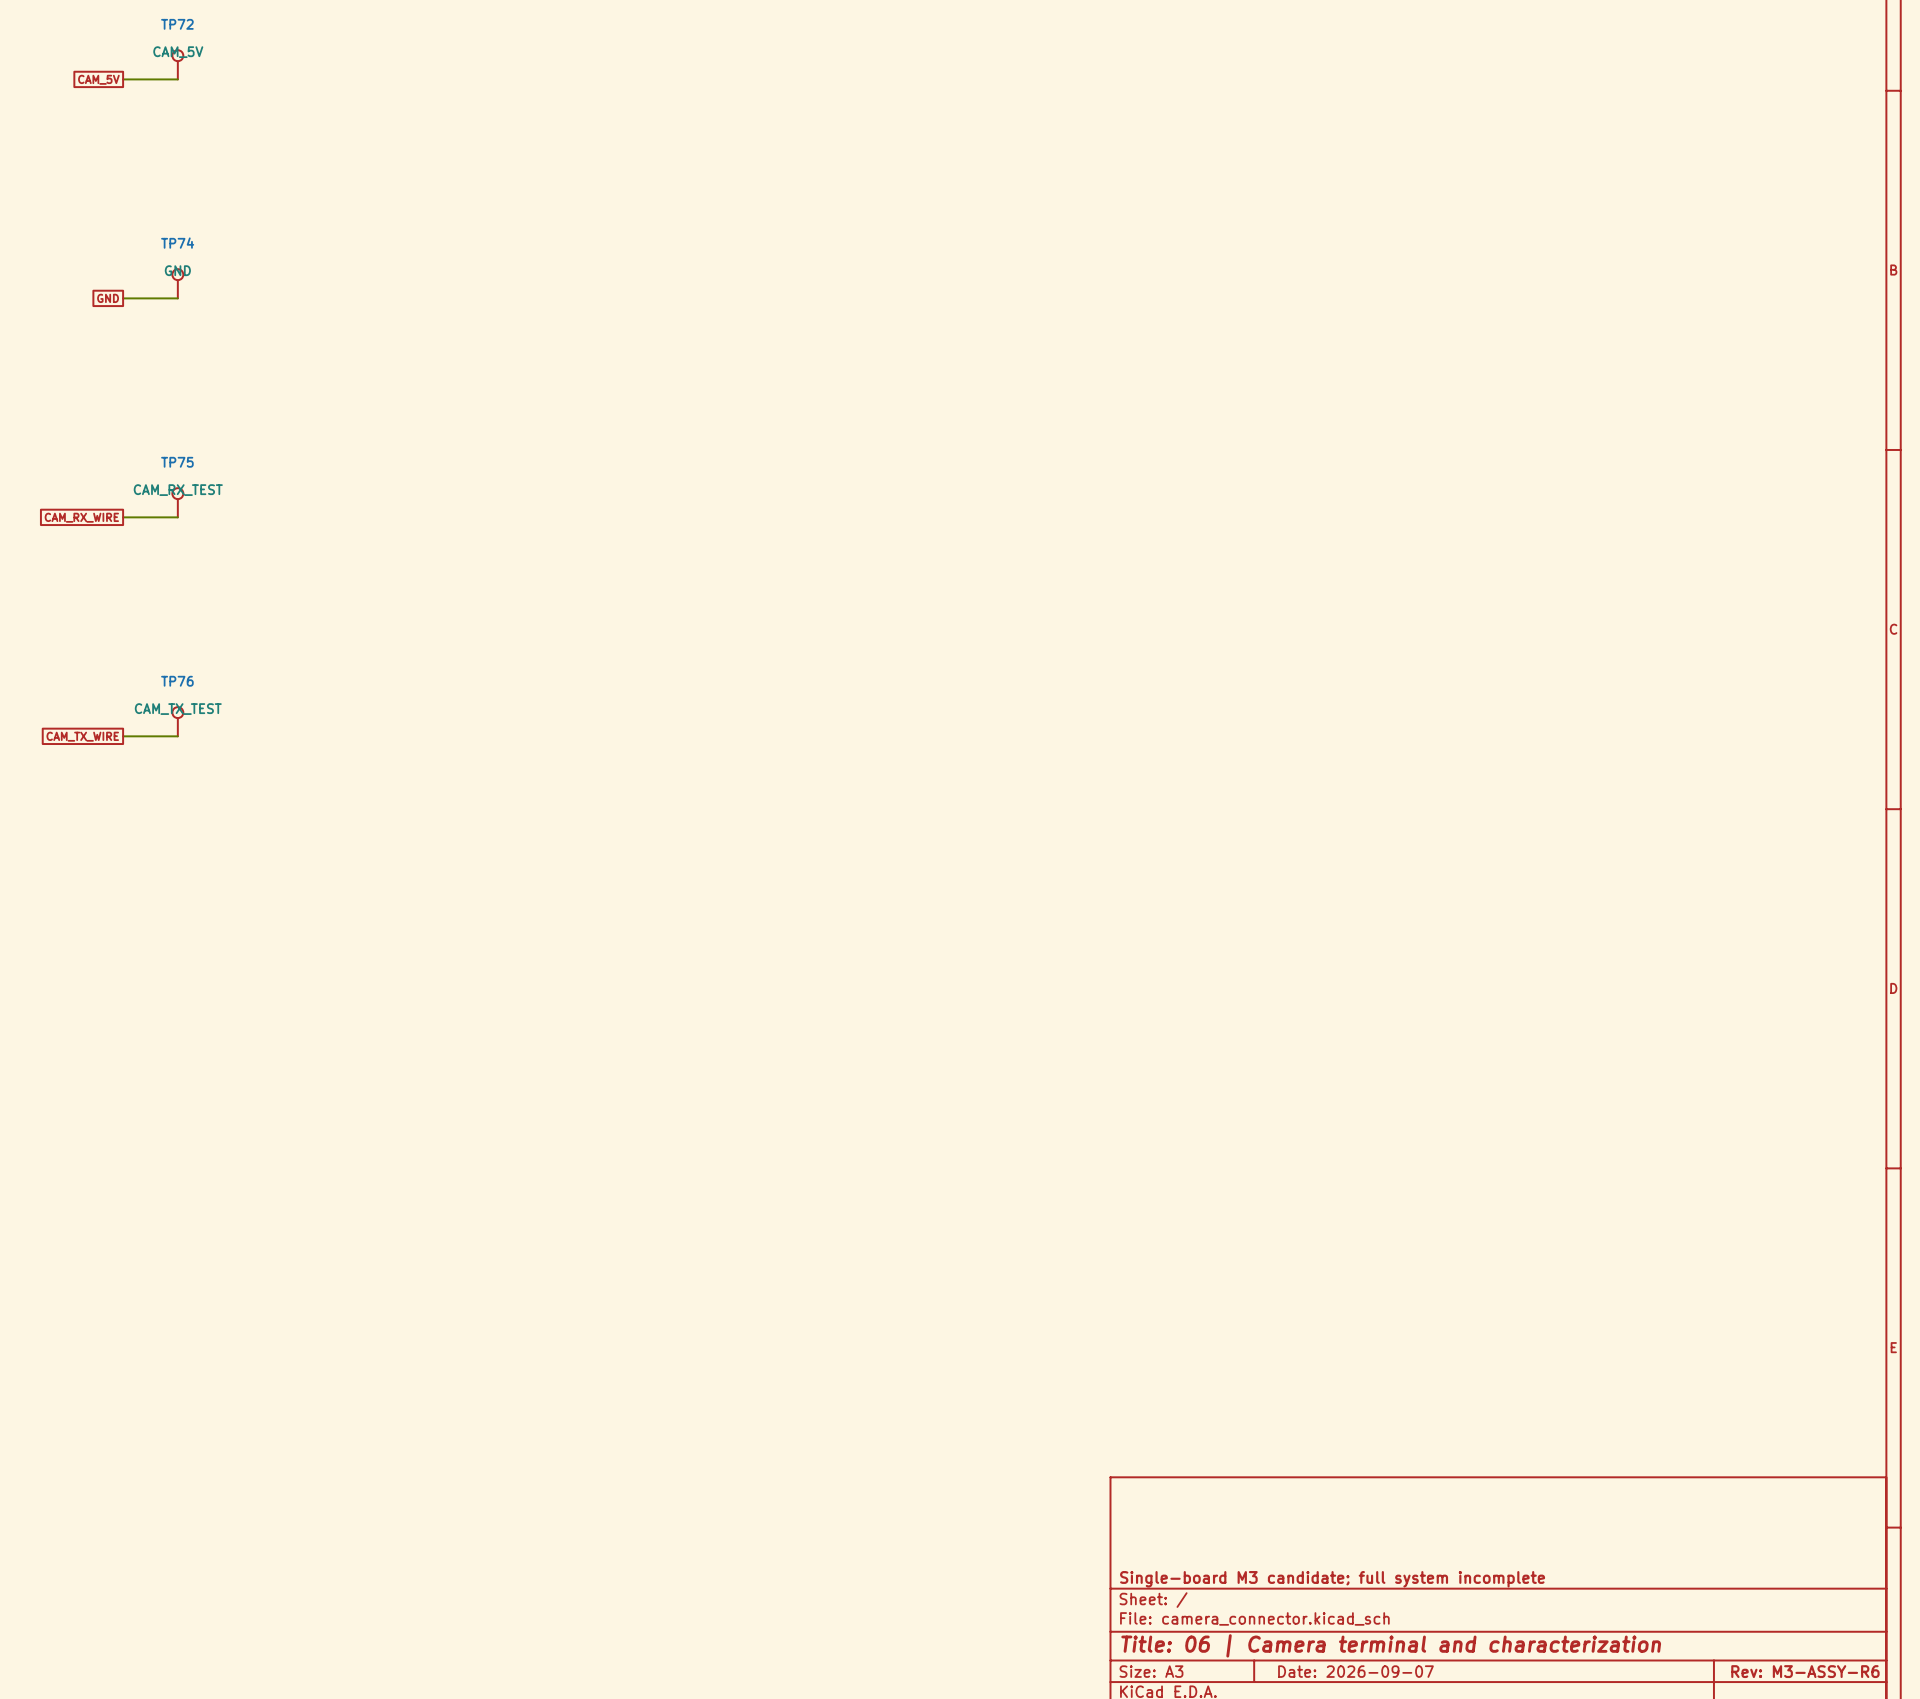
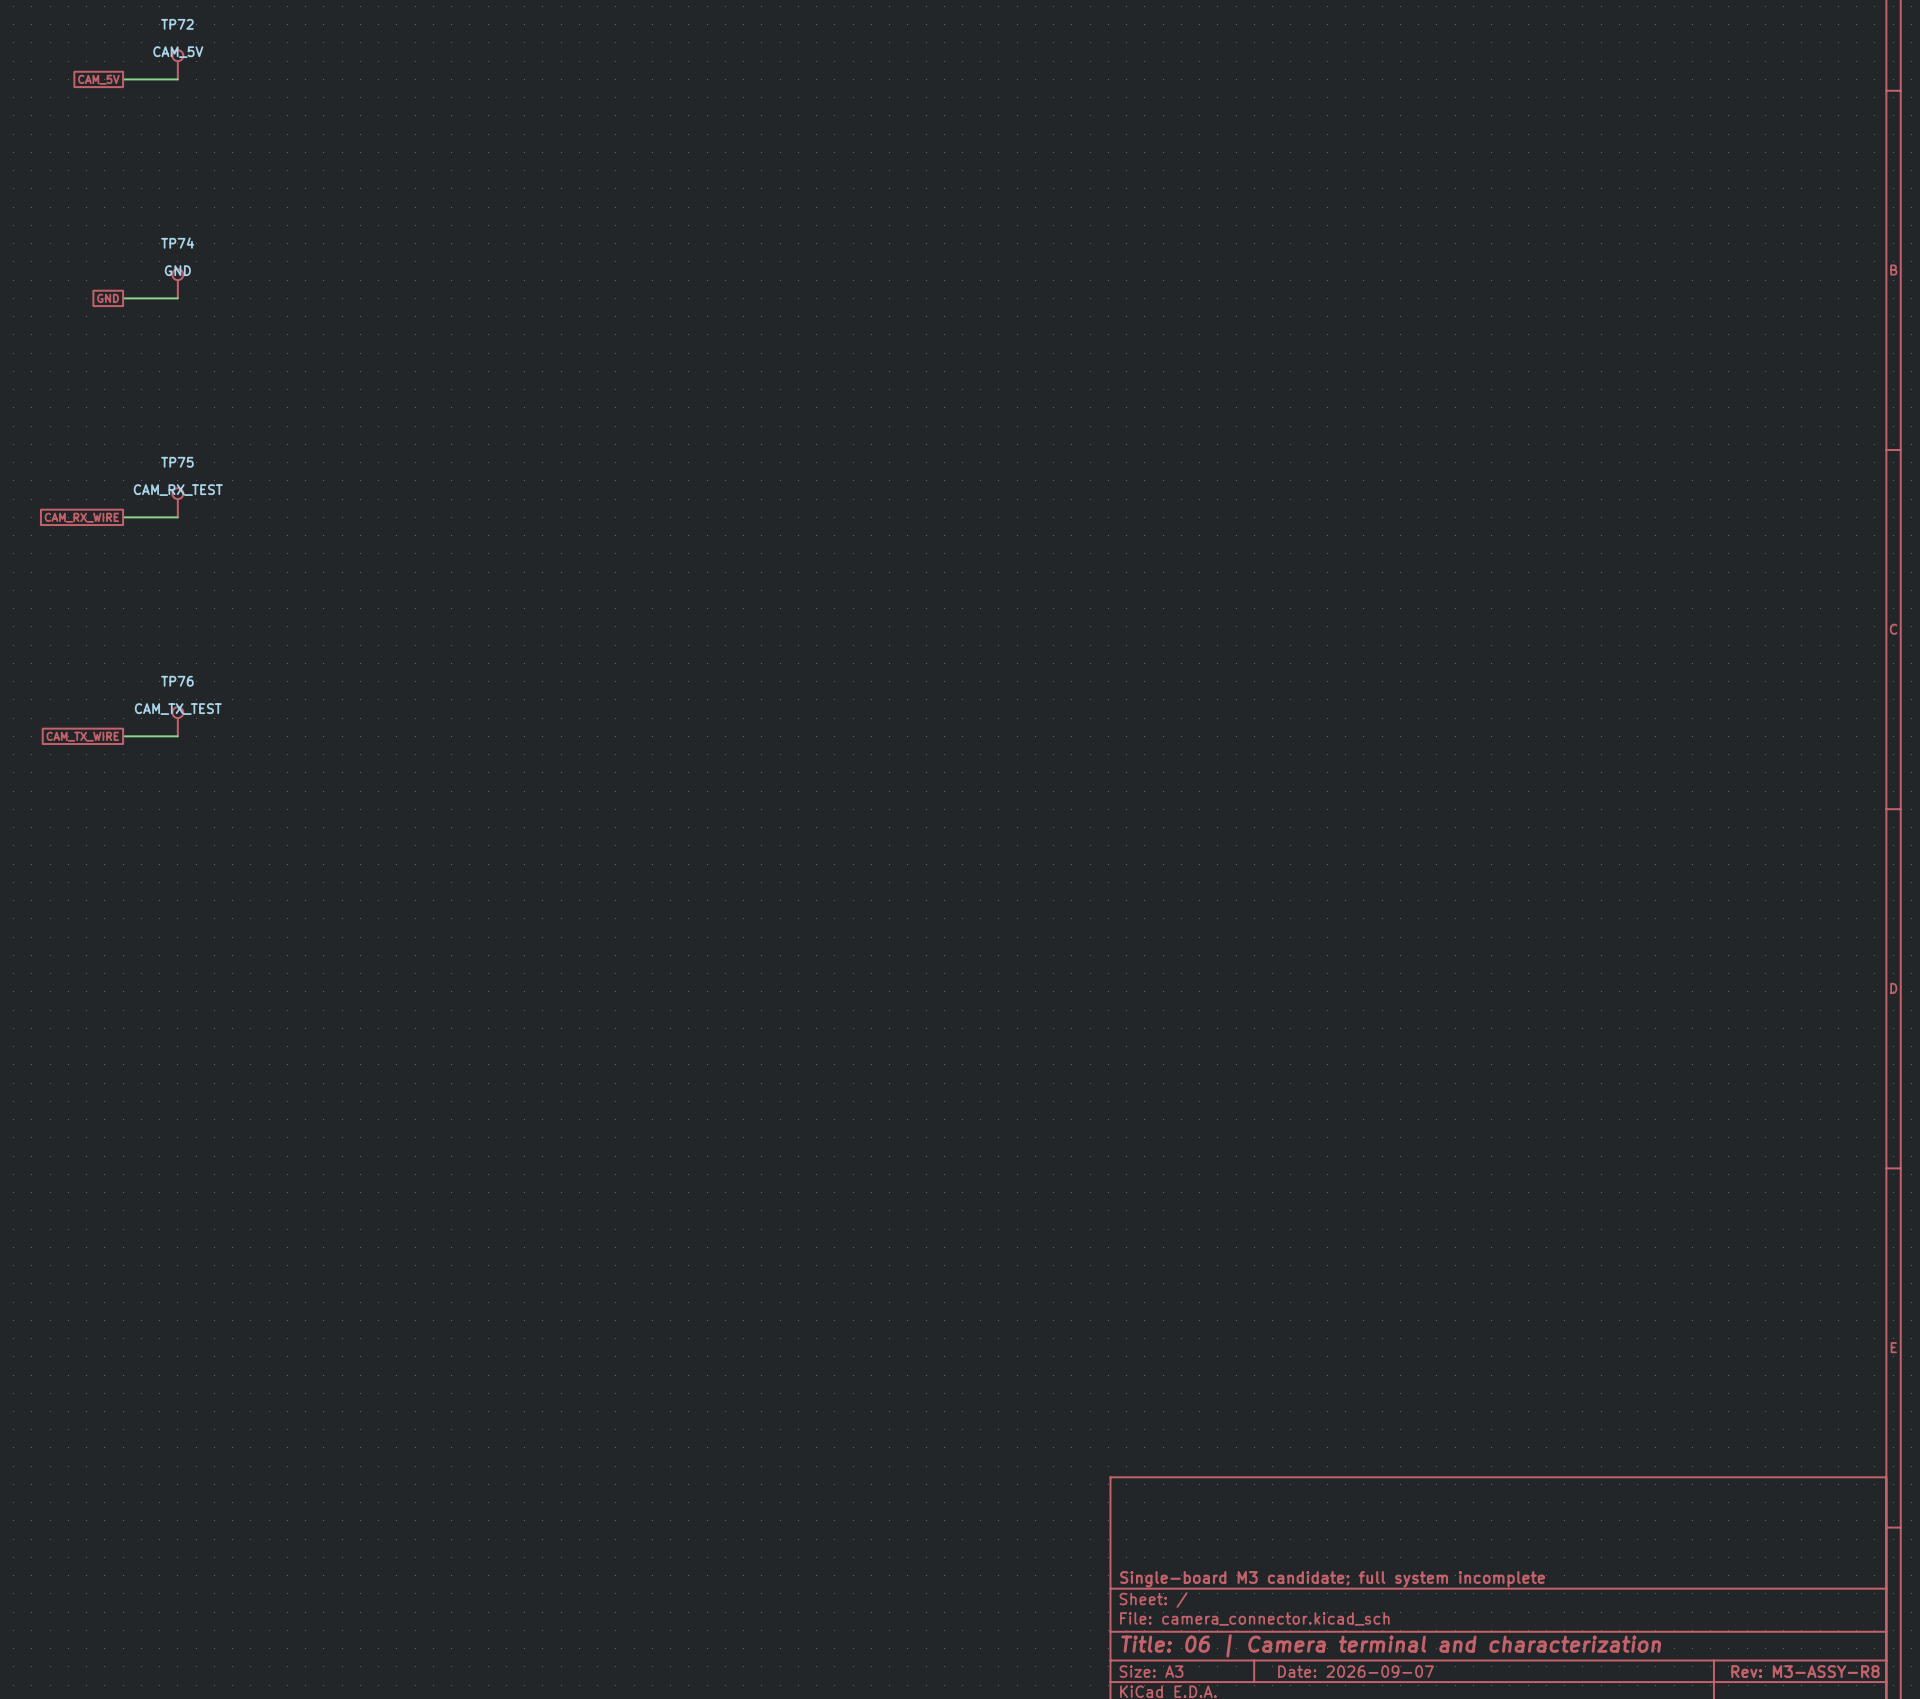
title block: Rev: M3-ASSY-R6 (1805, 1671) -> Rev: M3-ASSY-R8 (1805, 1671)

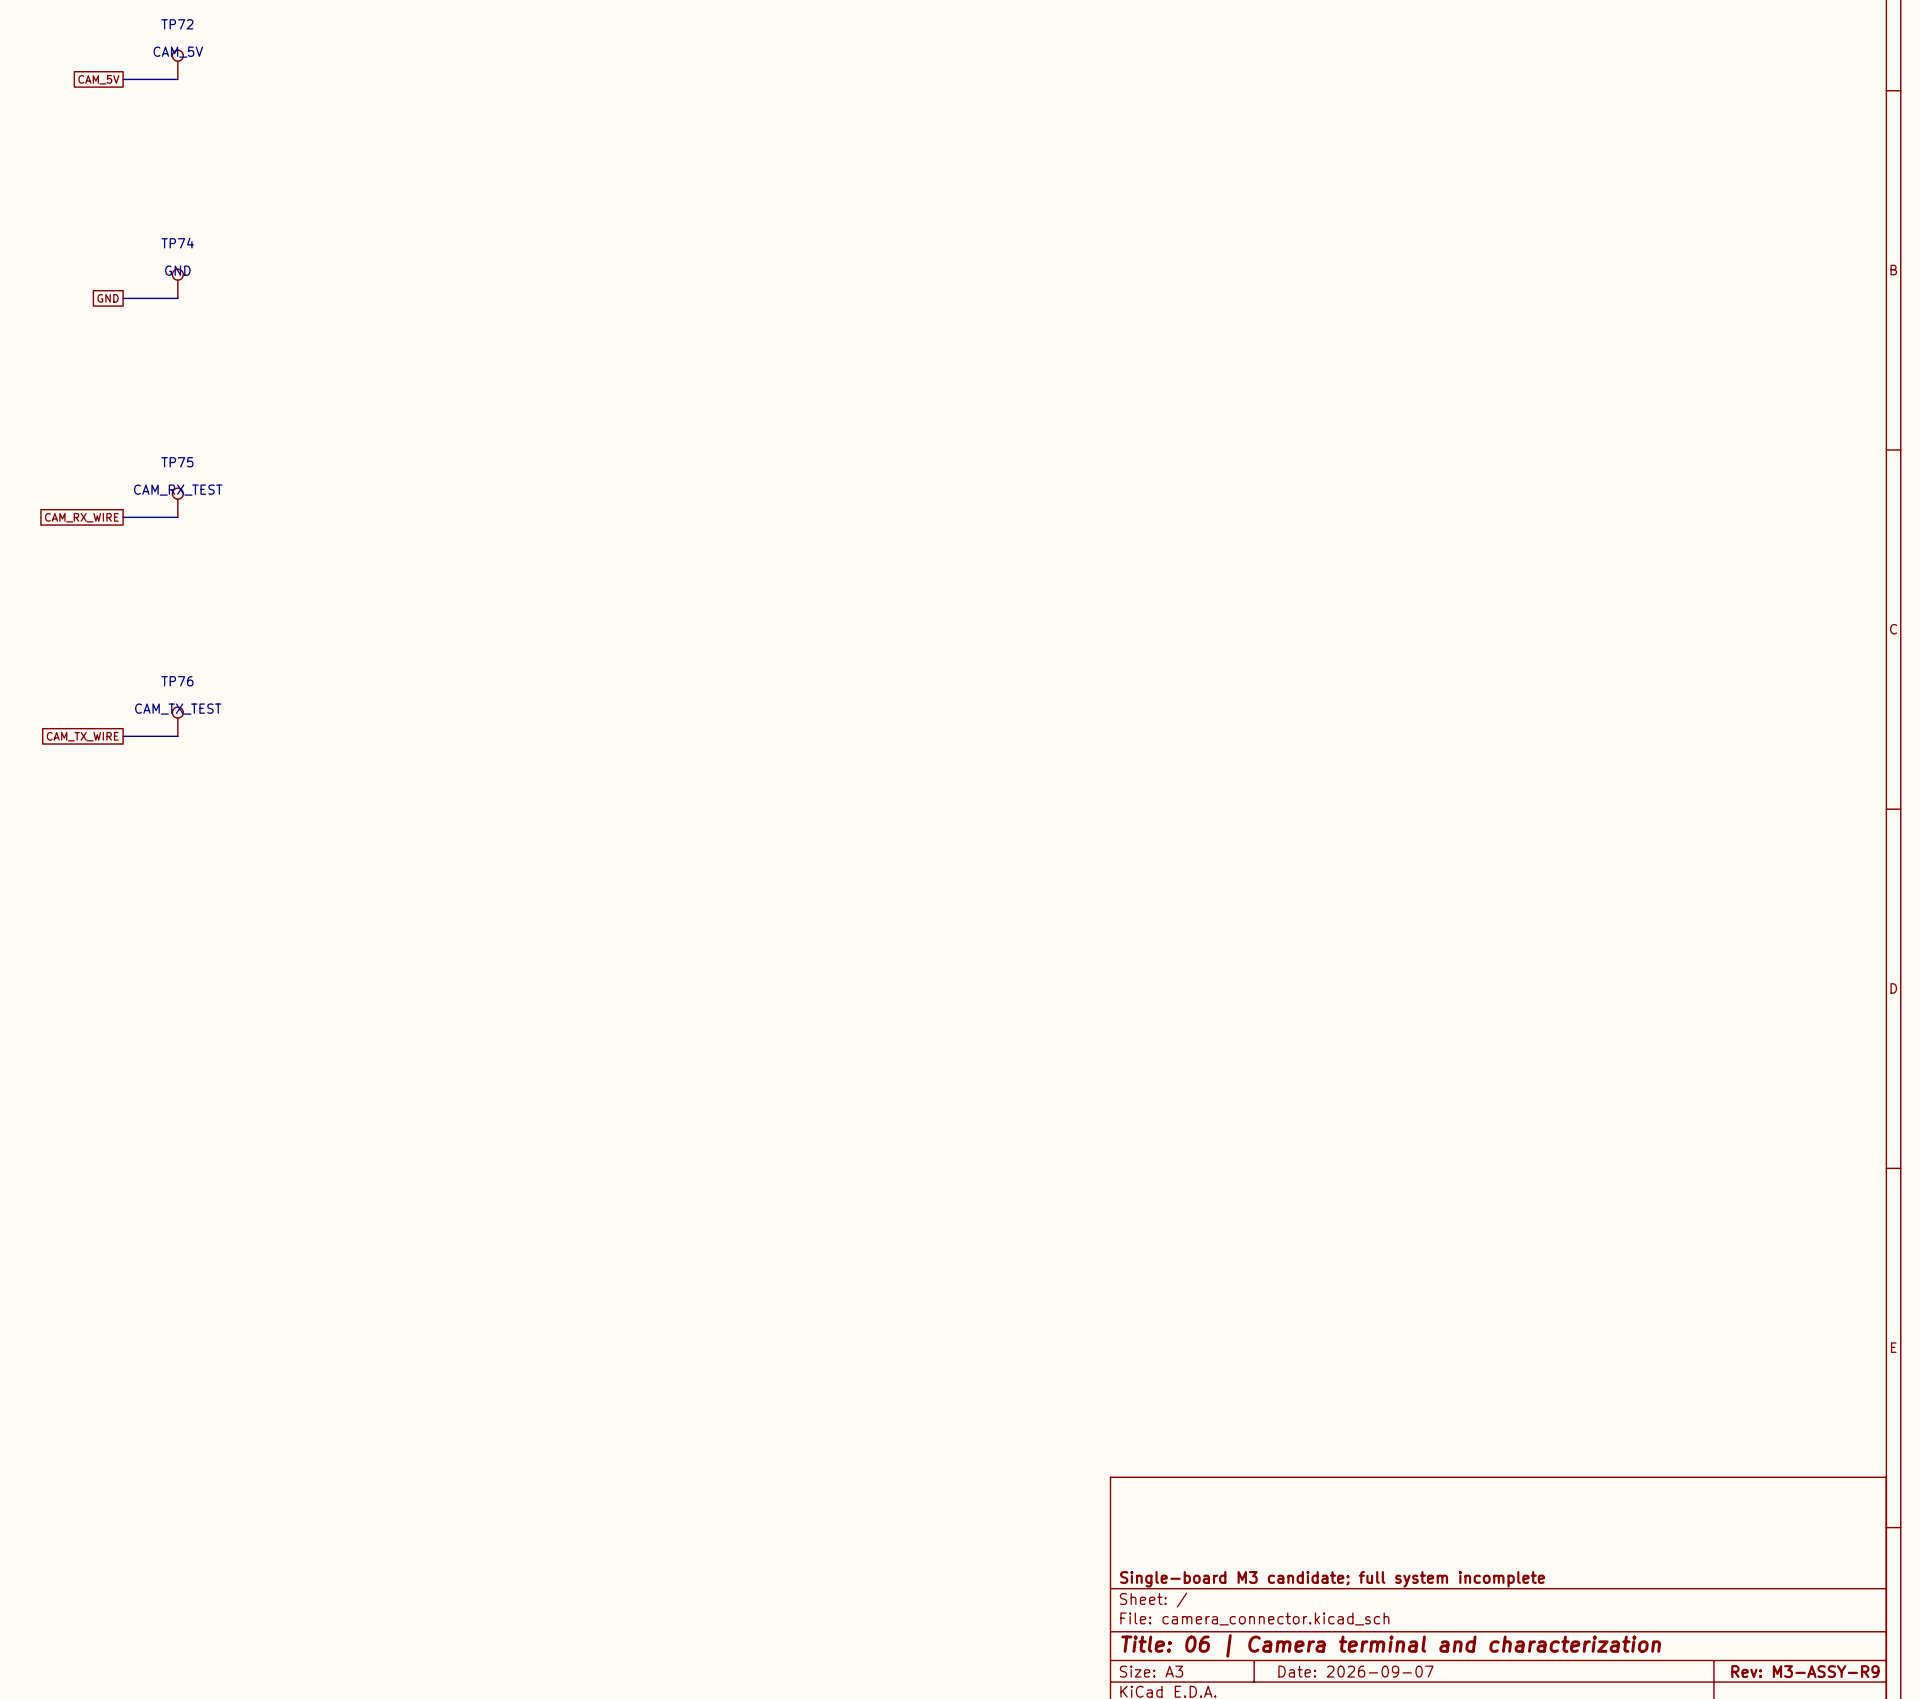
title block: Rev: M3-ASSY-R8 (1805, 1671) -> Rev: M3-ASSY-R9 (1805, 1671)

